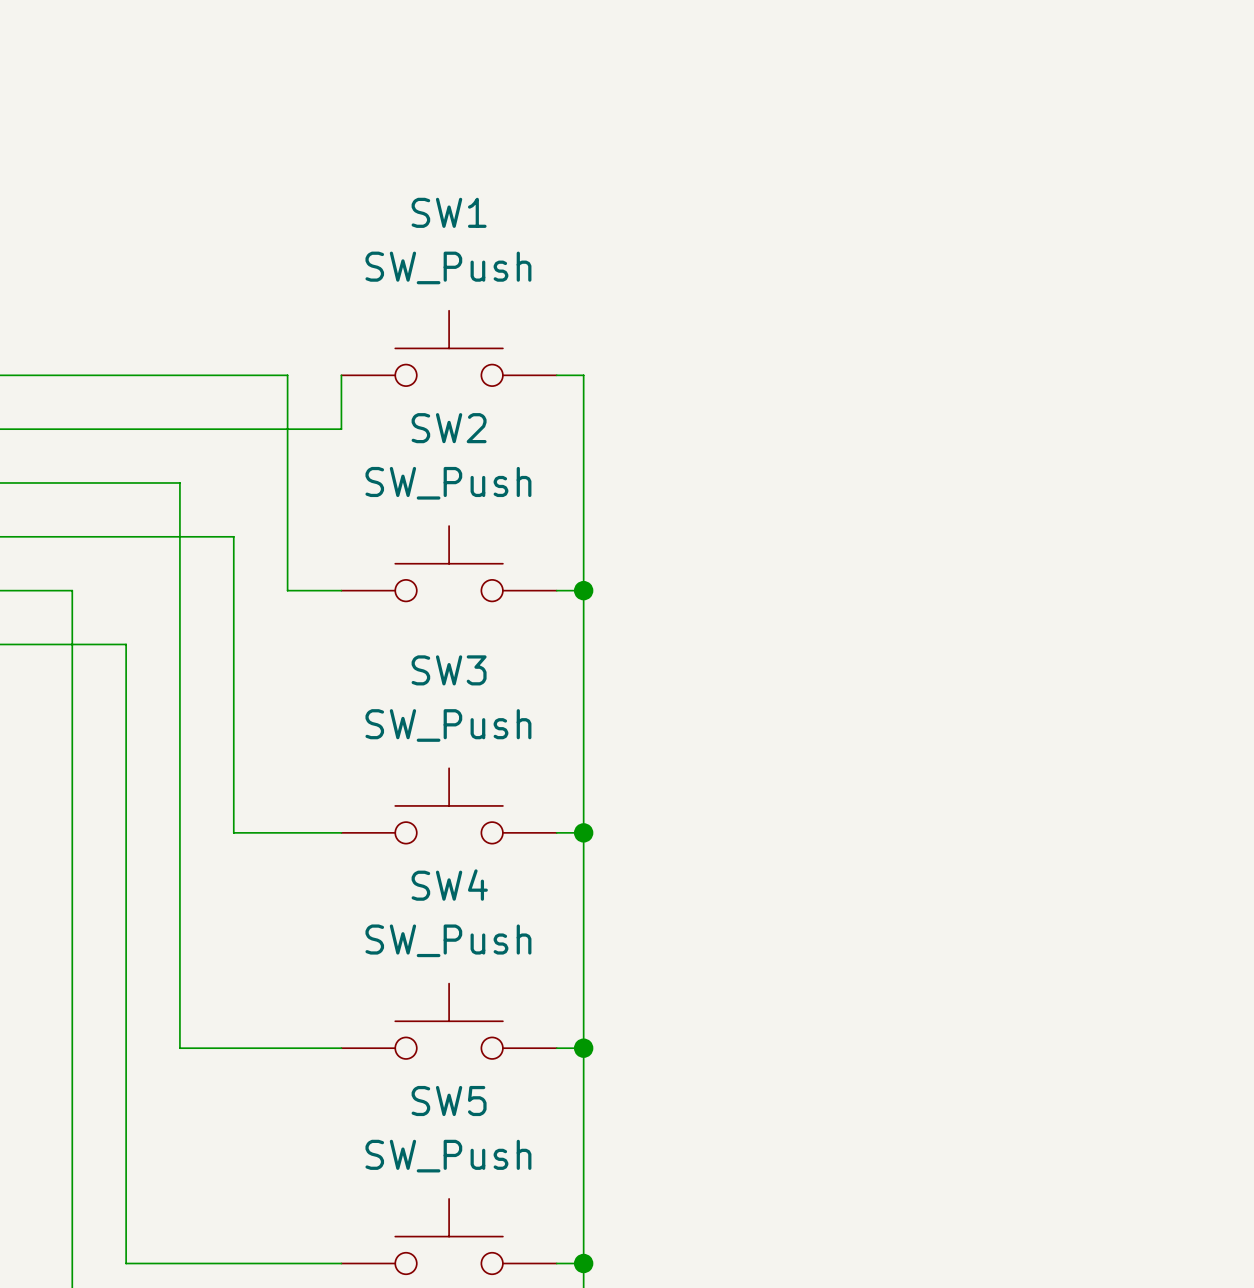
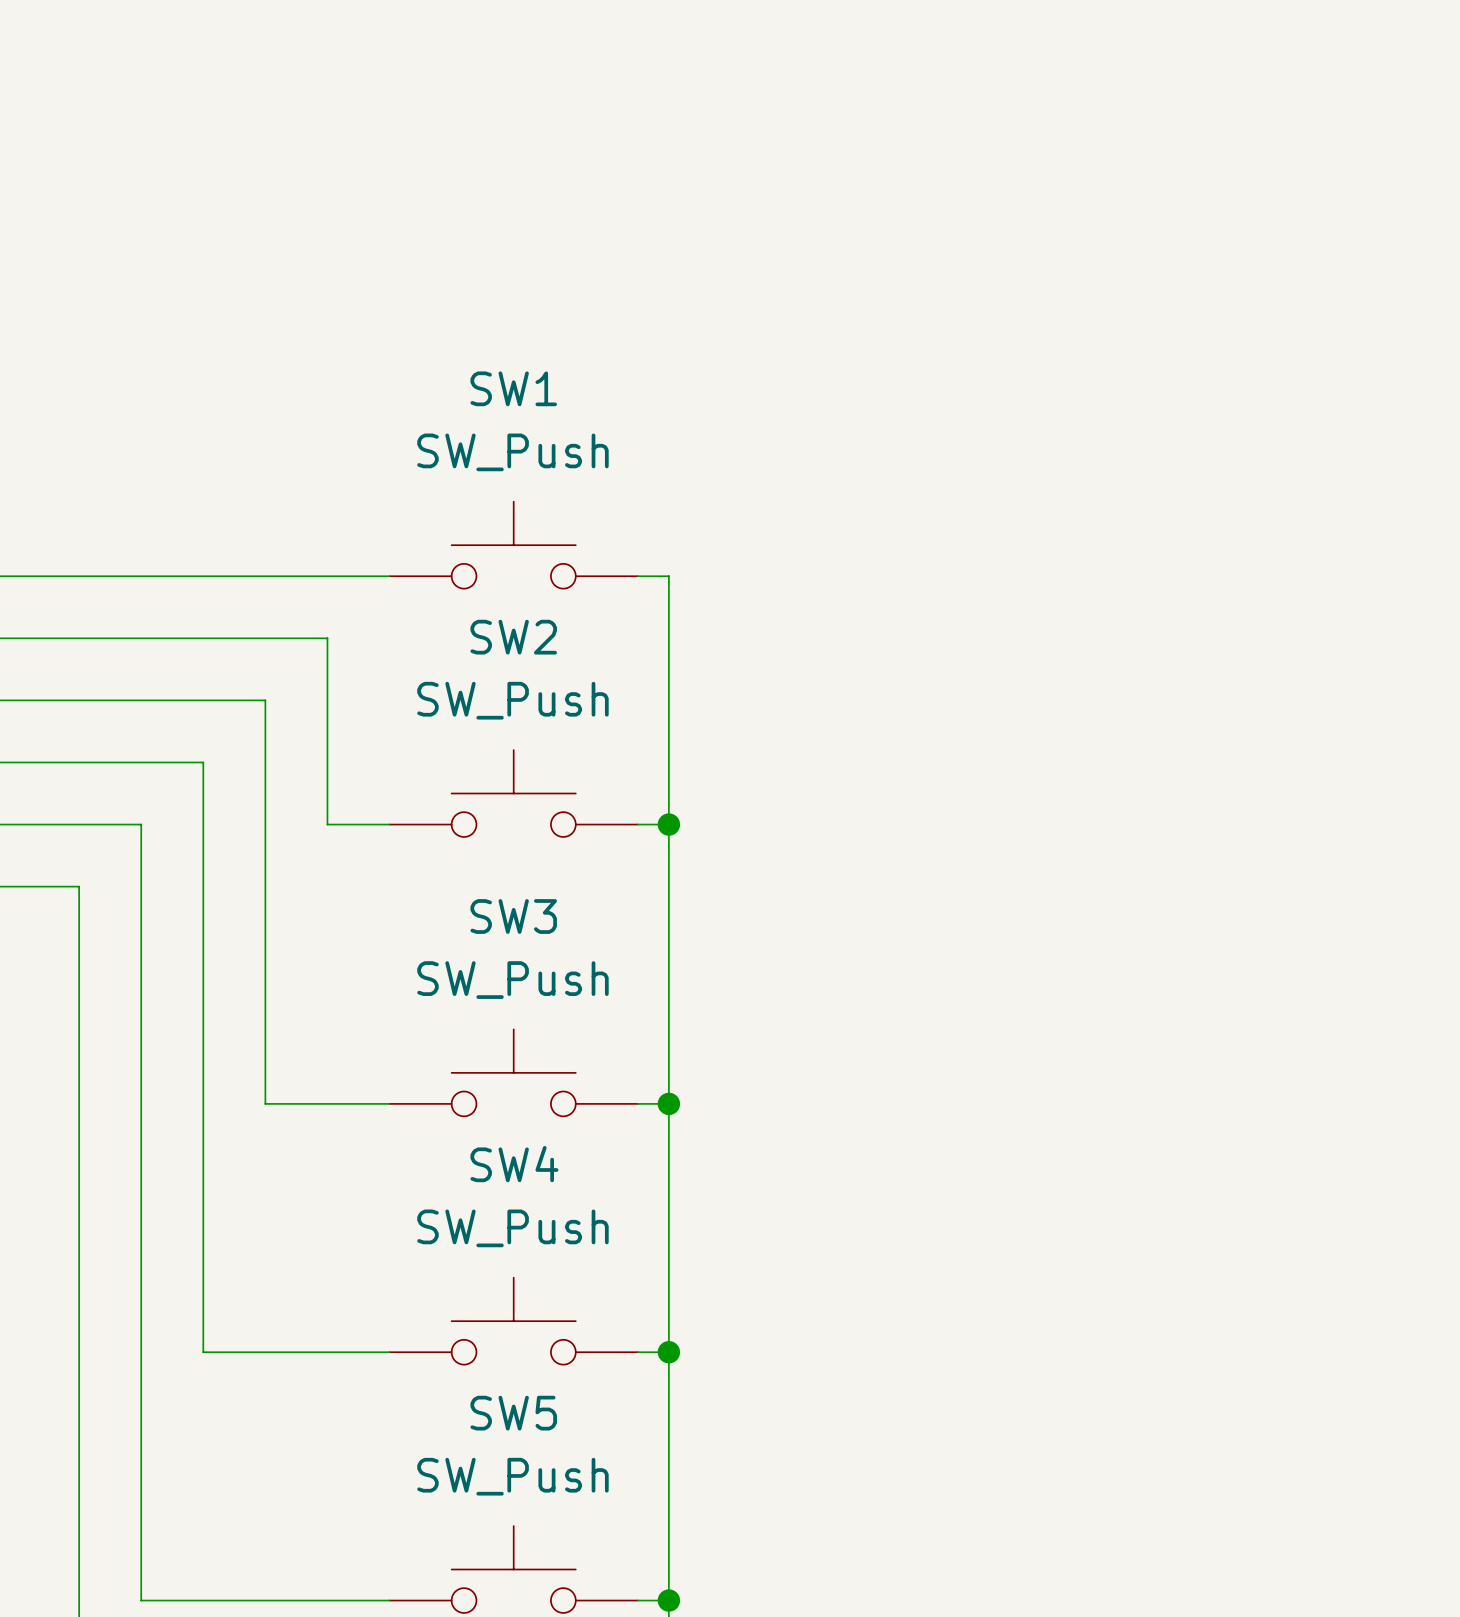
wire: (287, 375) (287, 429) (341, 429) (341, 375) -> (327, 576) (389, 576)
wire: (179, 482) (179, 536) (233, 536) -> (203, 700) (265, 700) (265, 762)
wire: (72, 590) (72, 644) (126, 644) -> (79, 824) (141, 824) (141, 886)

